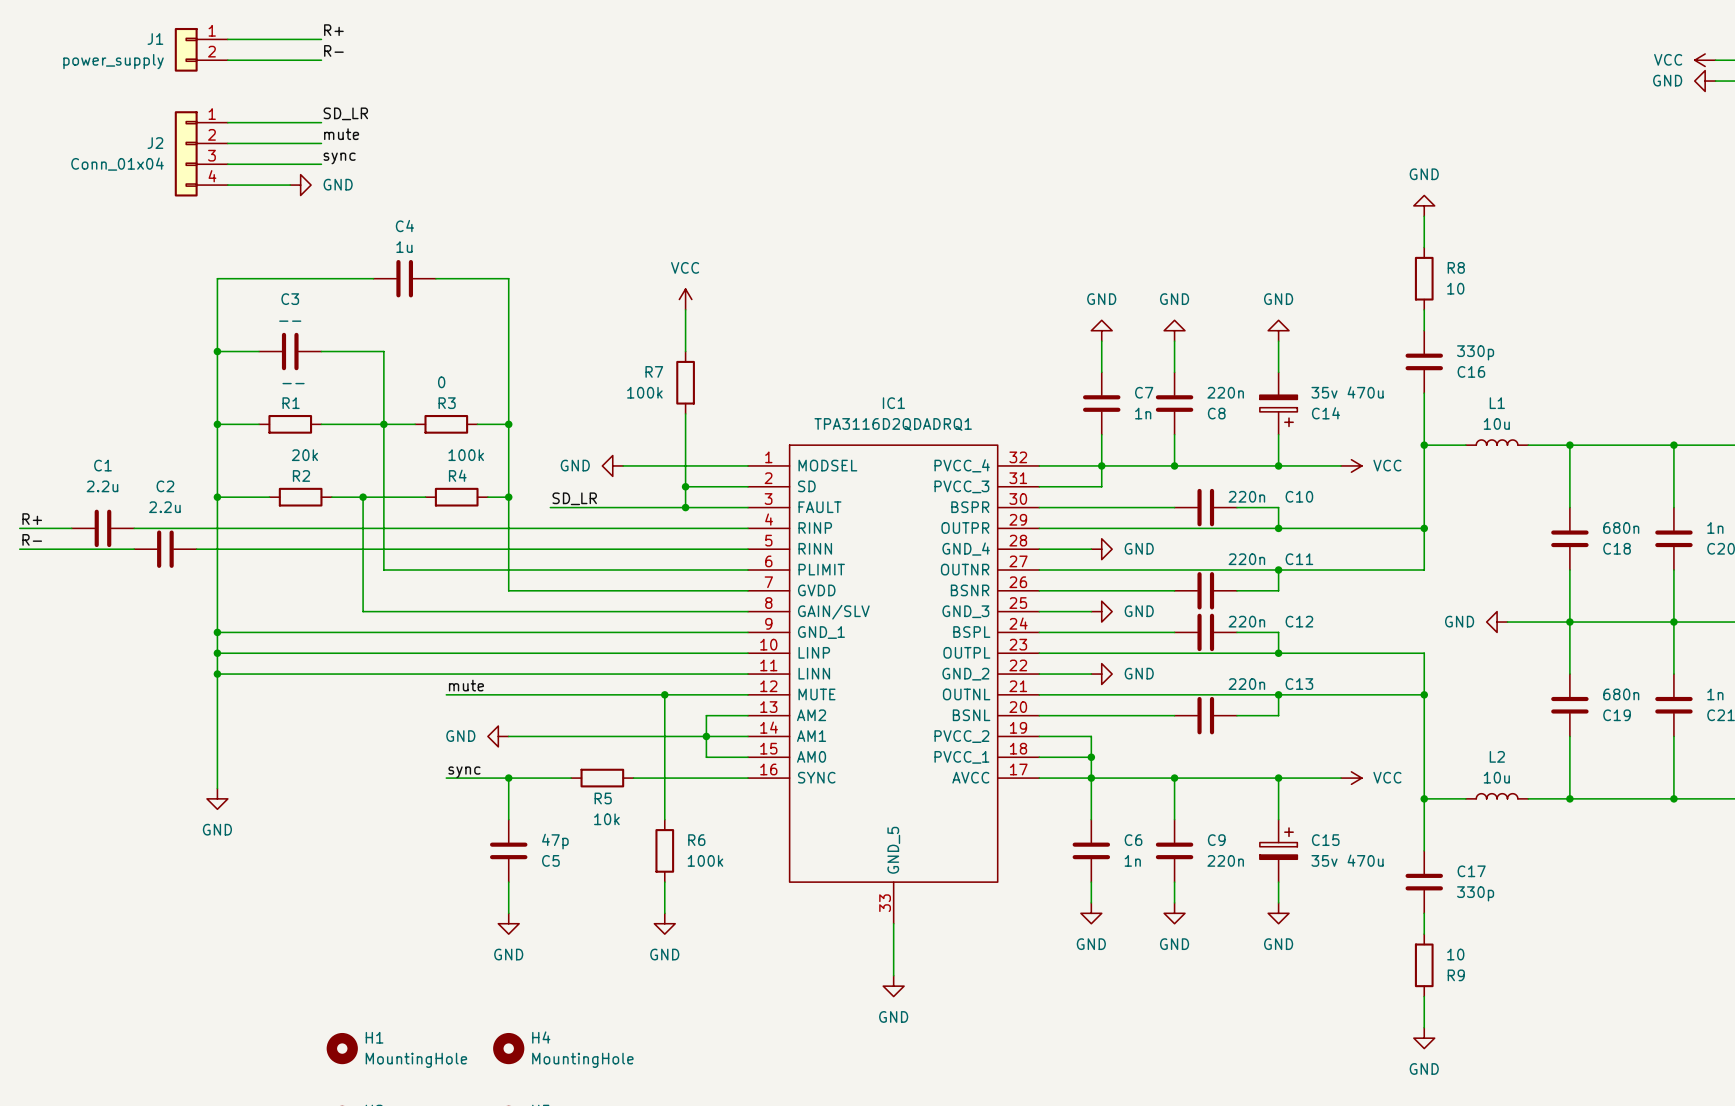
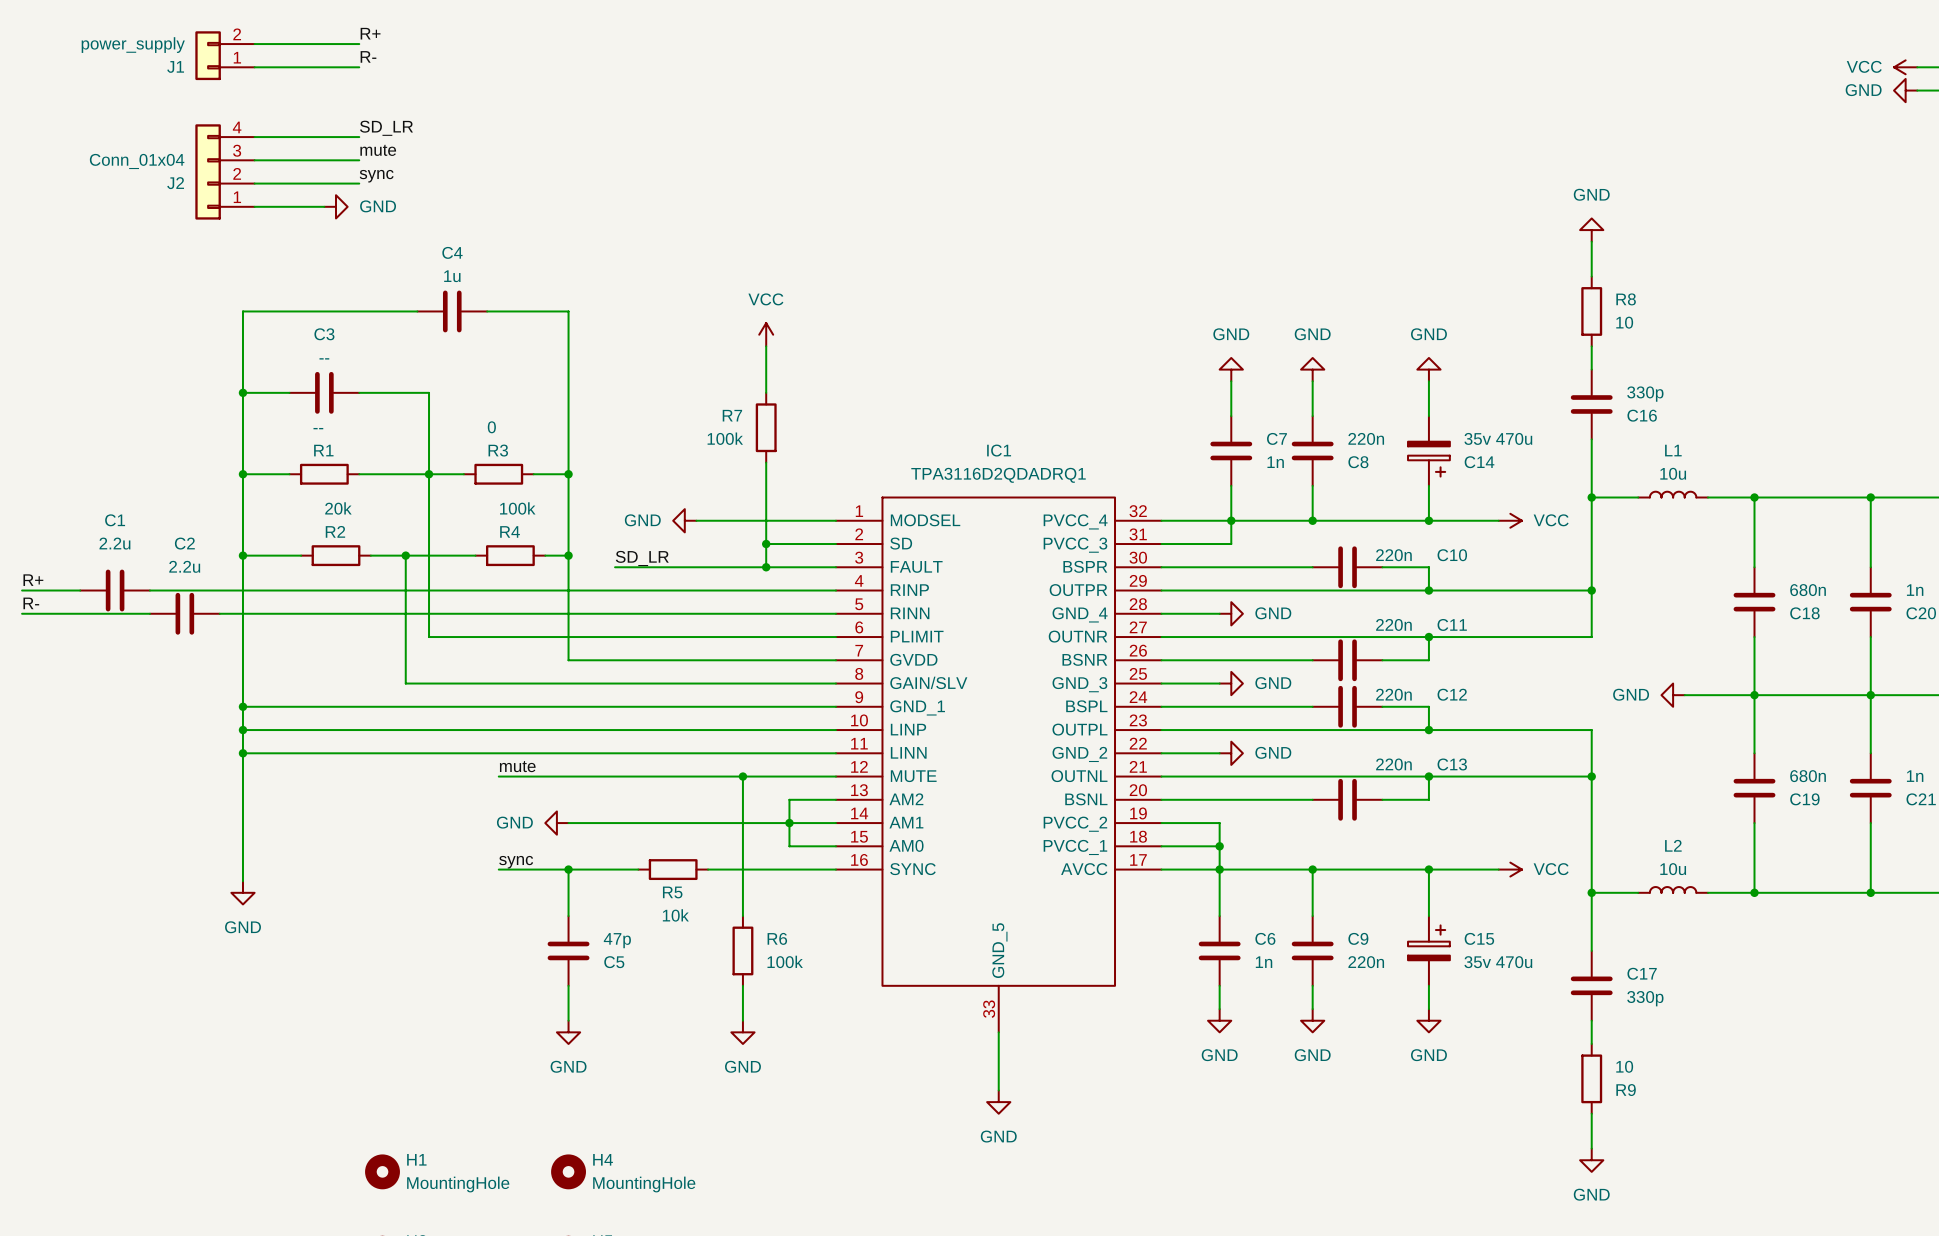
J1 flip: as is (186, 49) -> up-down (208, 55)
J2 flip: as is (186, 153) -> up-down (208, 171)

